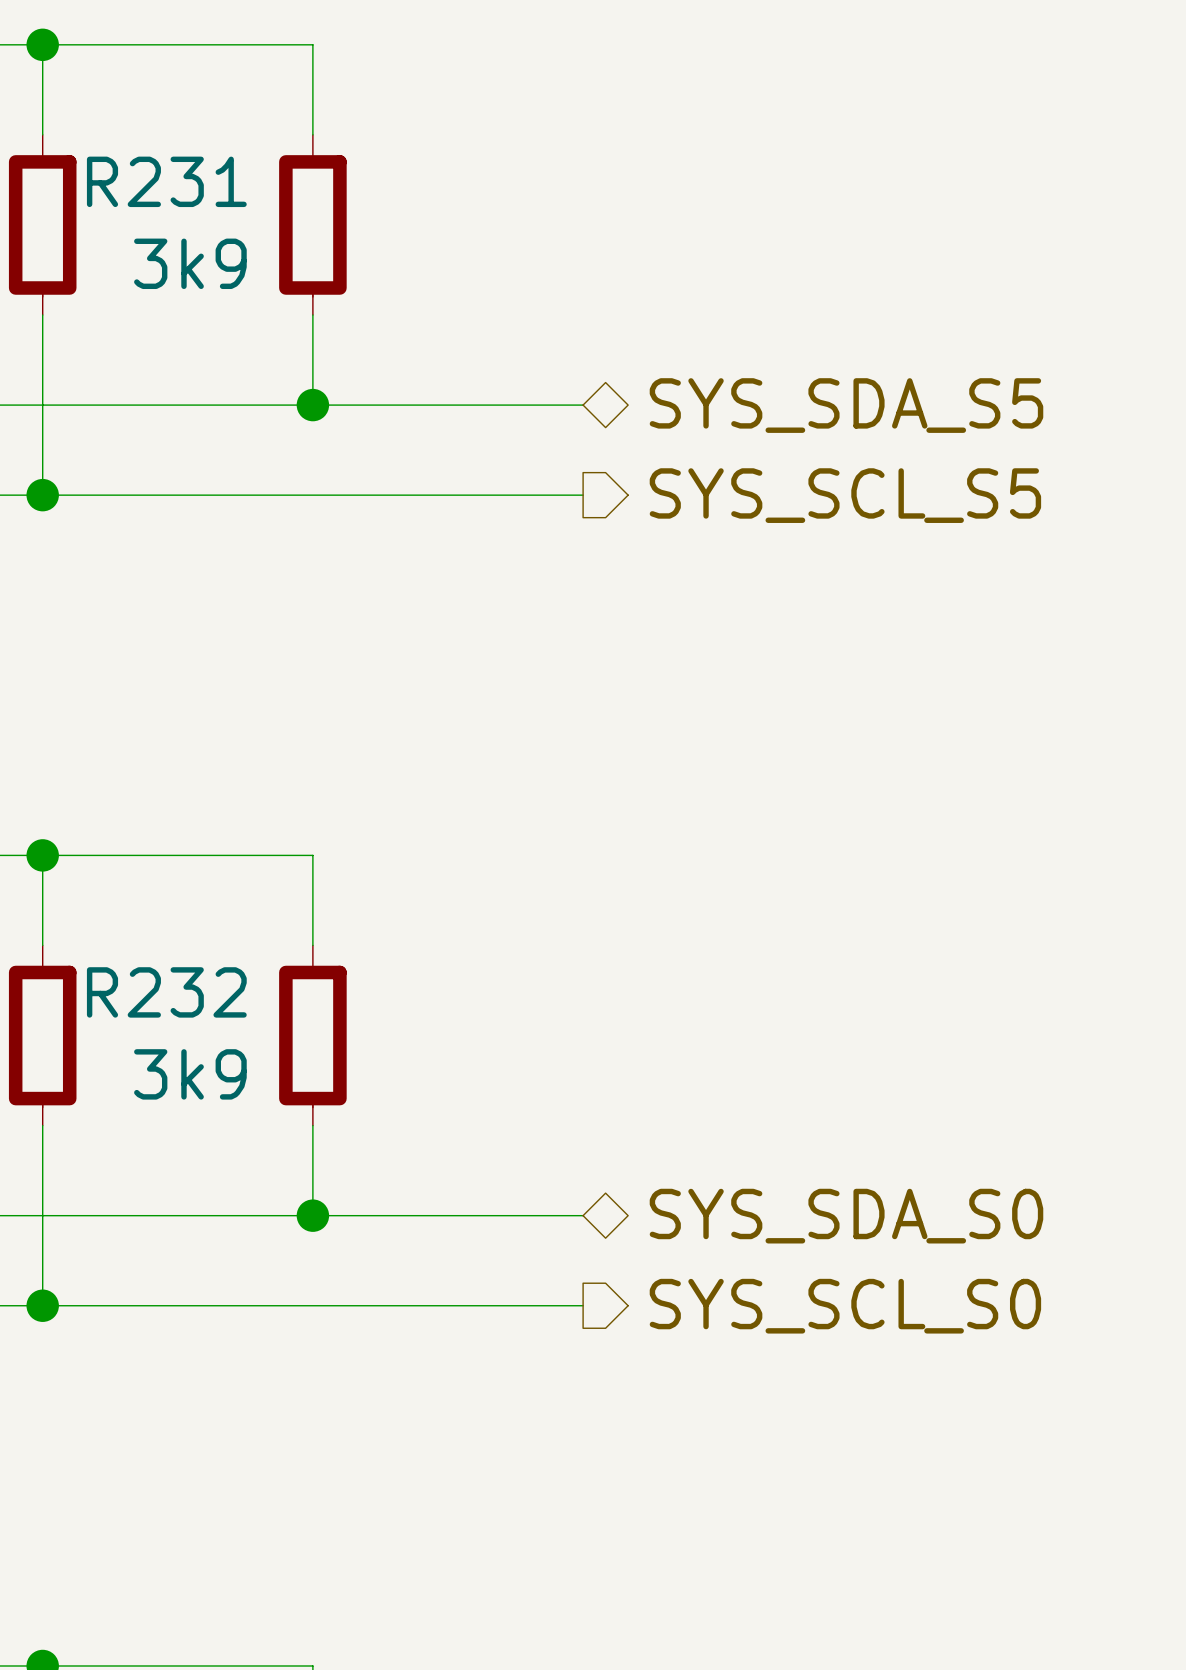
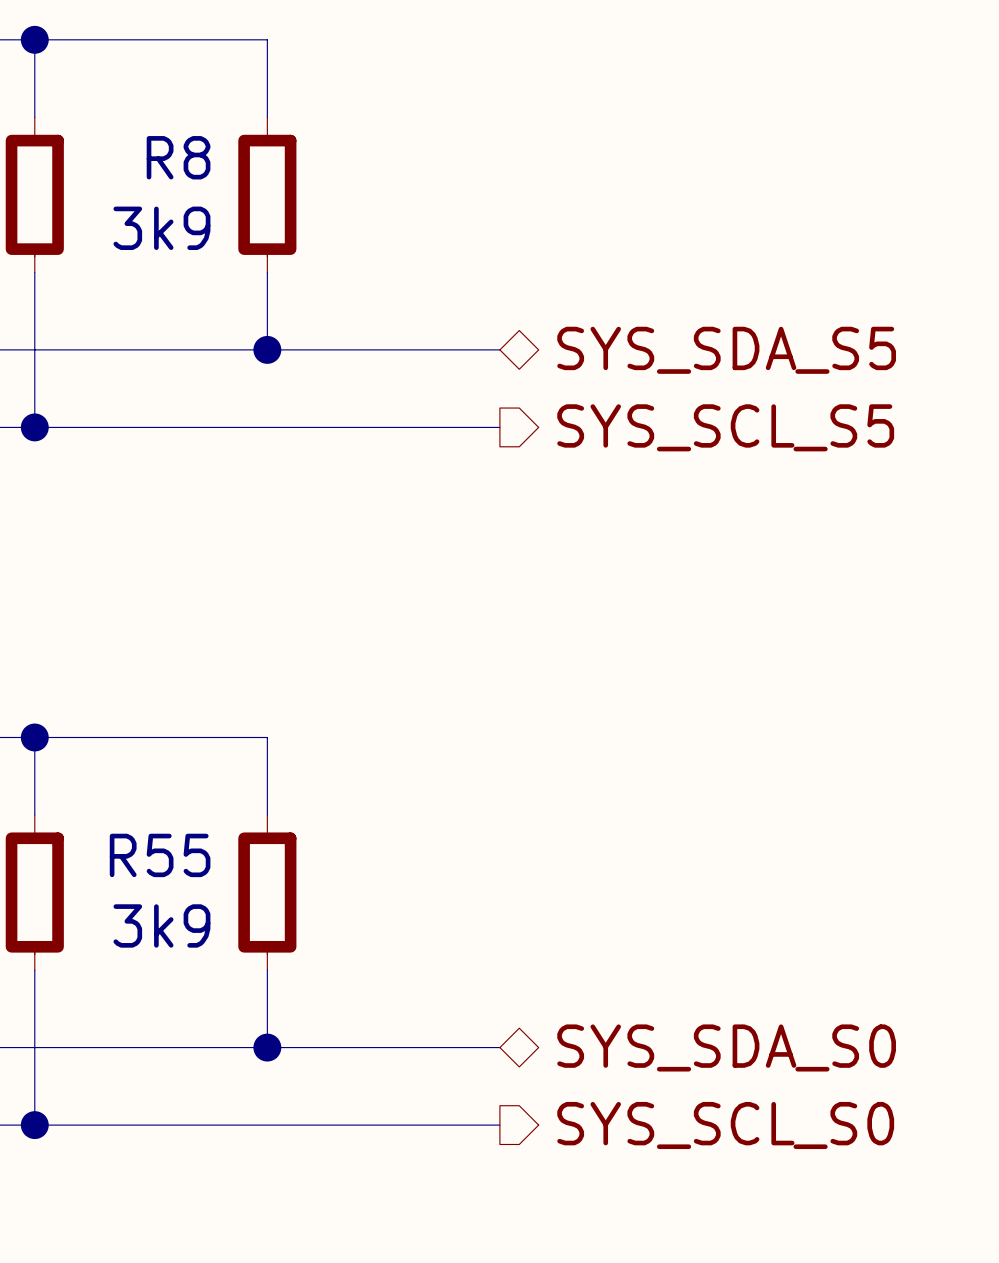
R231 name: R231 (166, 181) -> R8 (178, 157)
R232 name: R232 (166, 992) -> R55 (160, 855)

